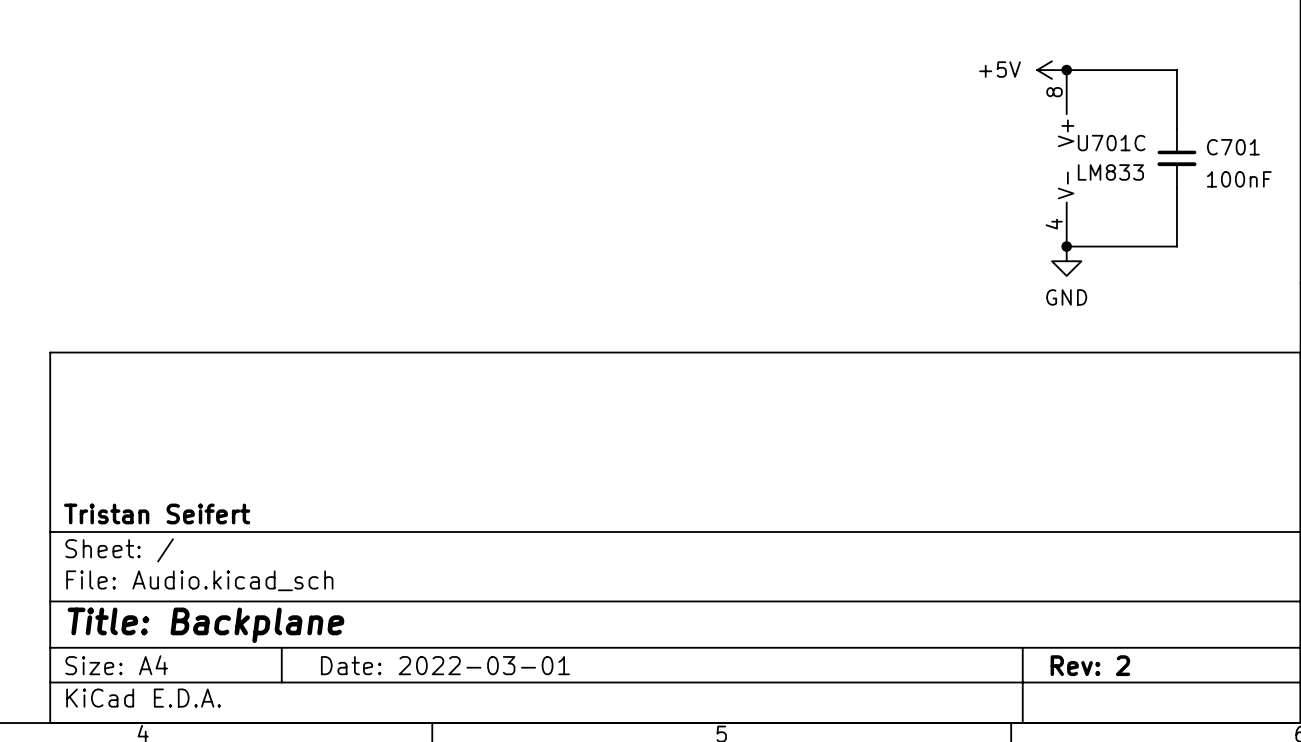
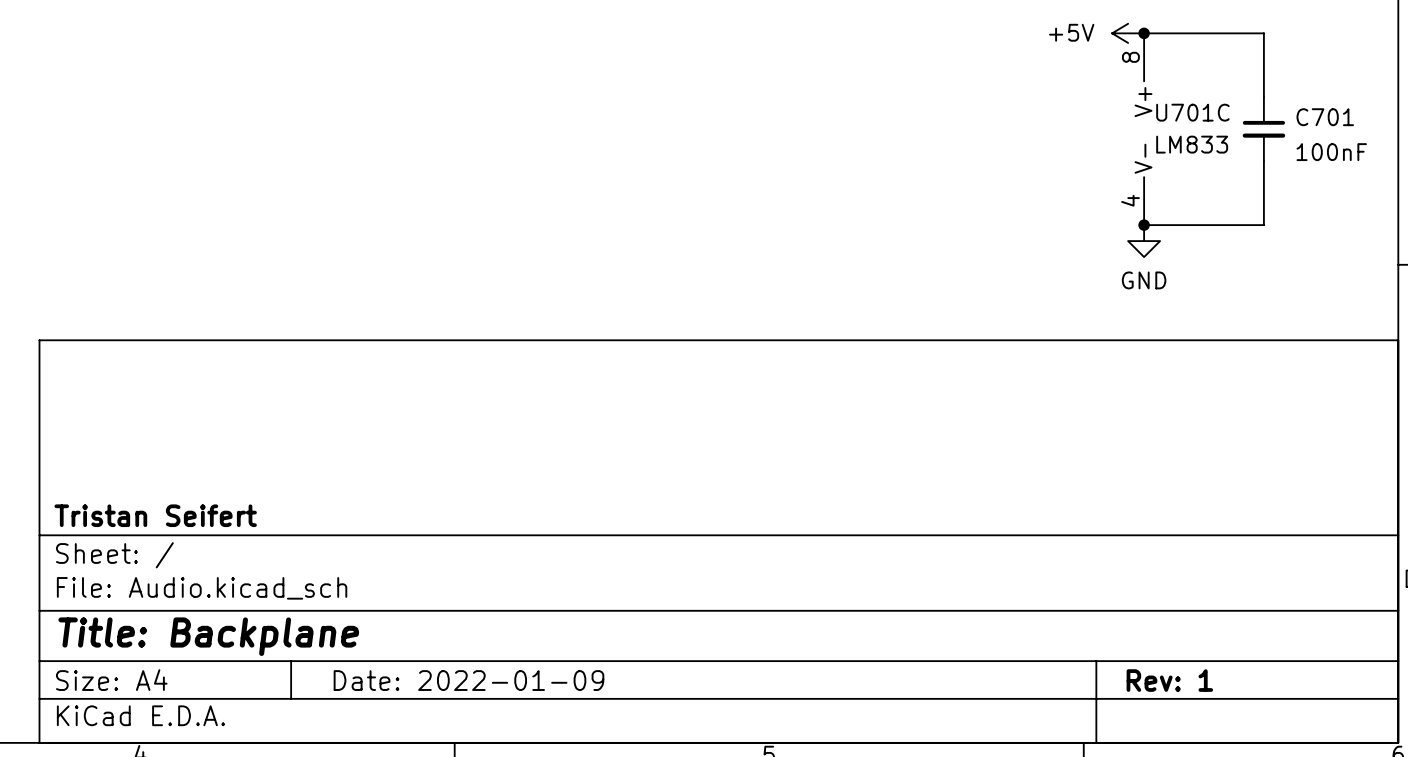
title block: Date: 2022-03-01 (445, 665) -> Date: 2022-01-09 (468, 680)
title block: Rev: 2 (1090, 665) -> Rev: 1 (1169, 680)

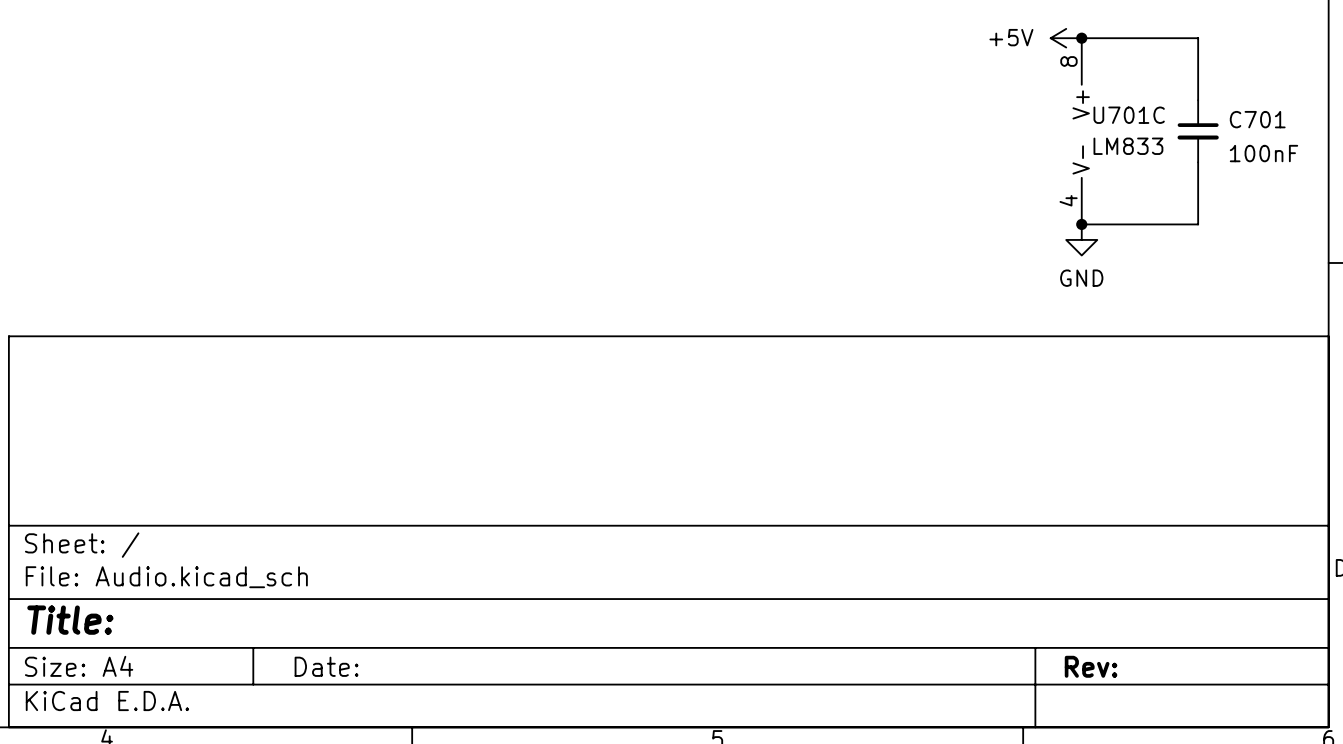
title block: Tristan Seifert (155, 515) -> none
title block: Title: Backplane (208, 636) -> Title: (70, 620)
title block: Date: 2022-01-09 (468, 680) -> Date: (326, 666)
title block: Rev: 1 (1169, 680) -> Rev: (1091, 666)

